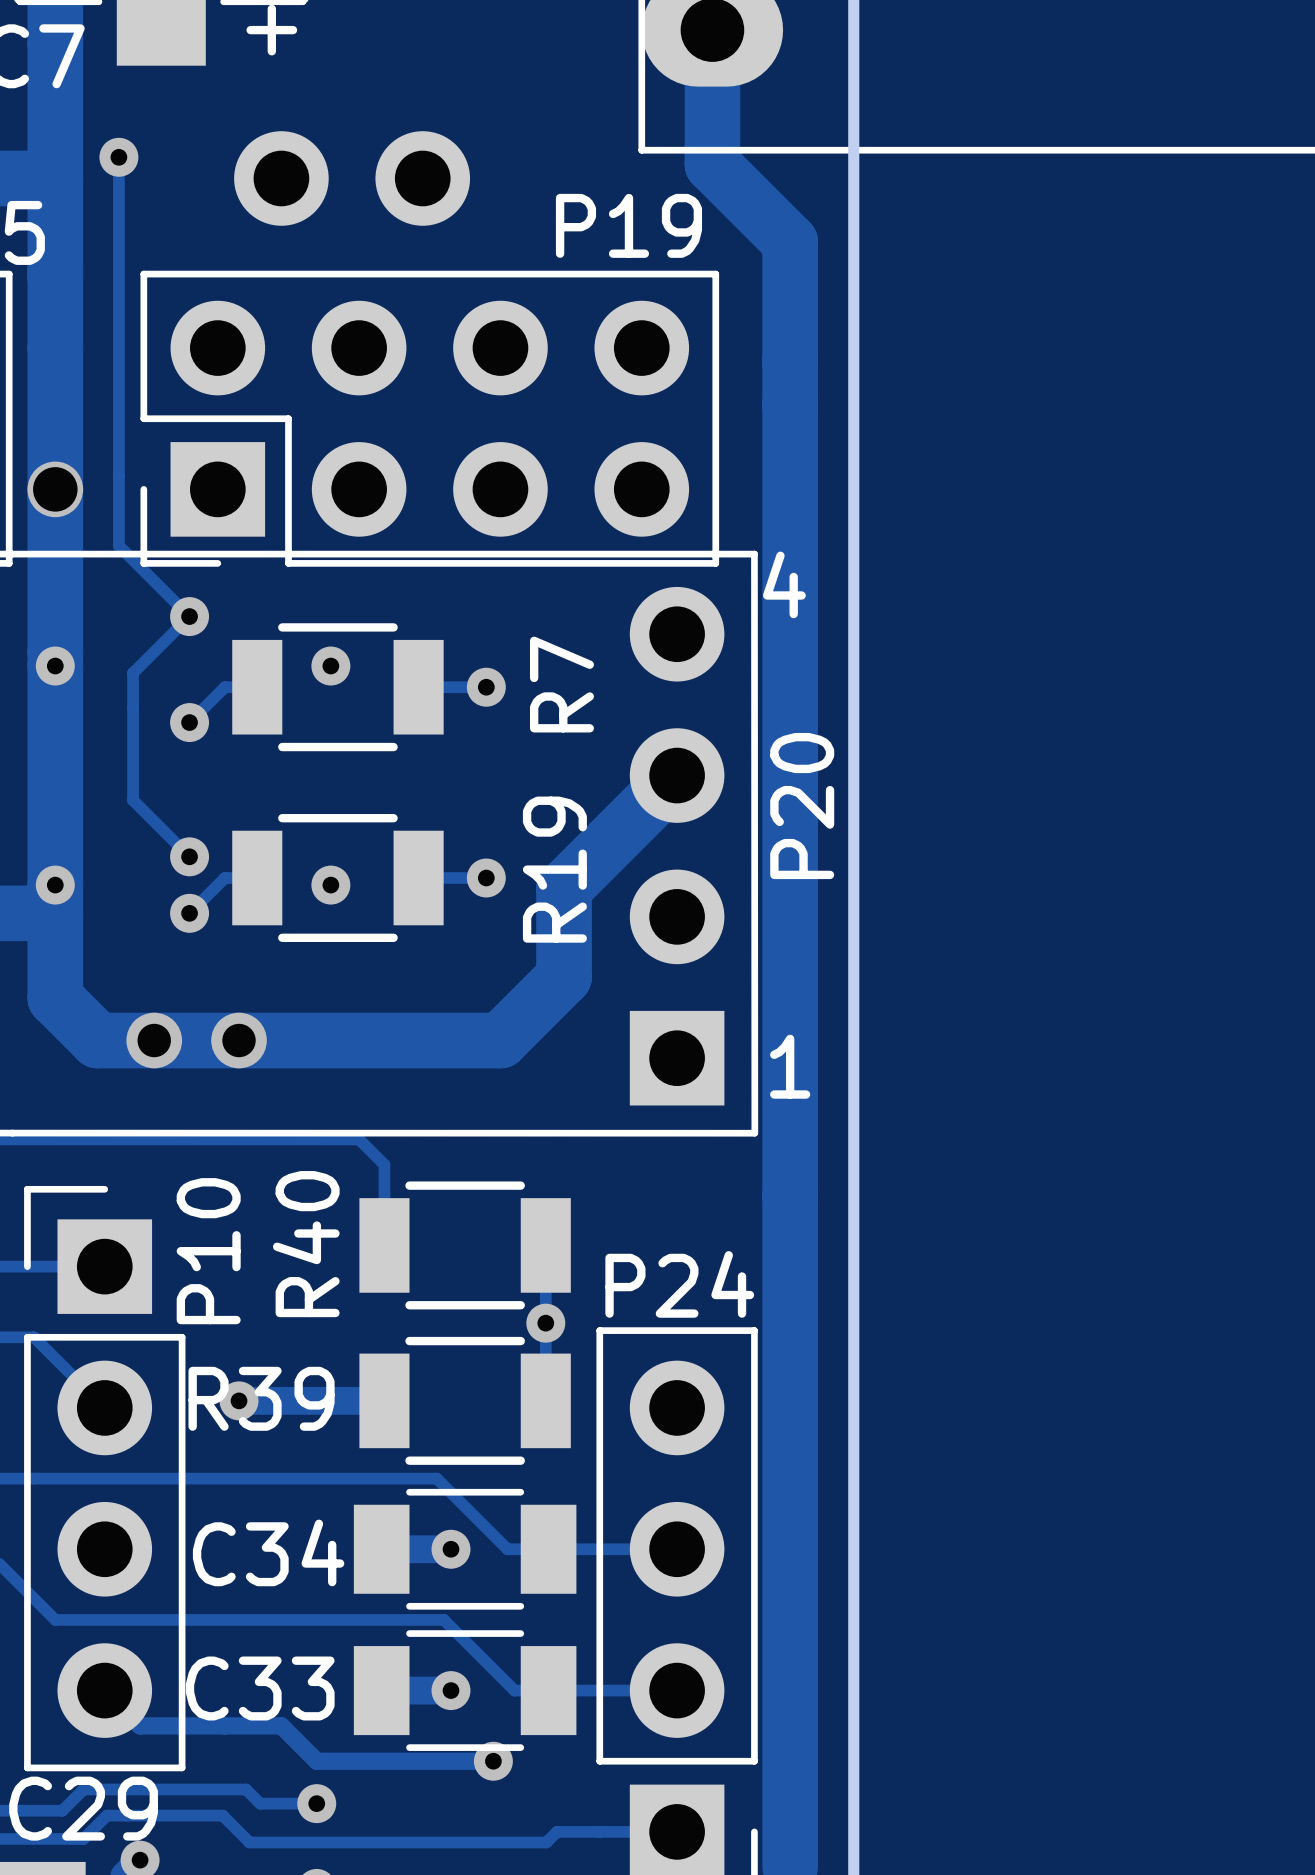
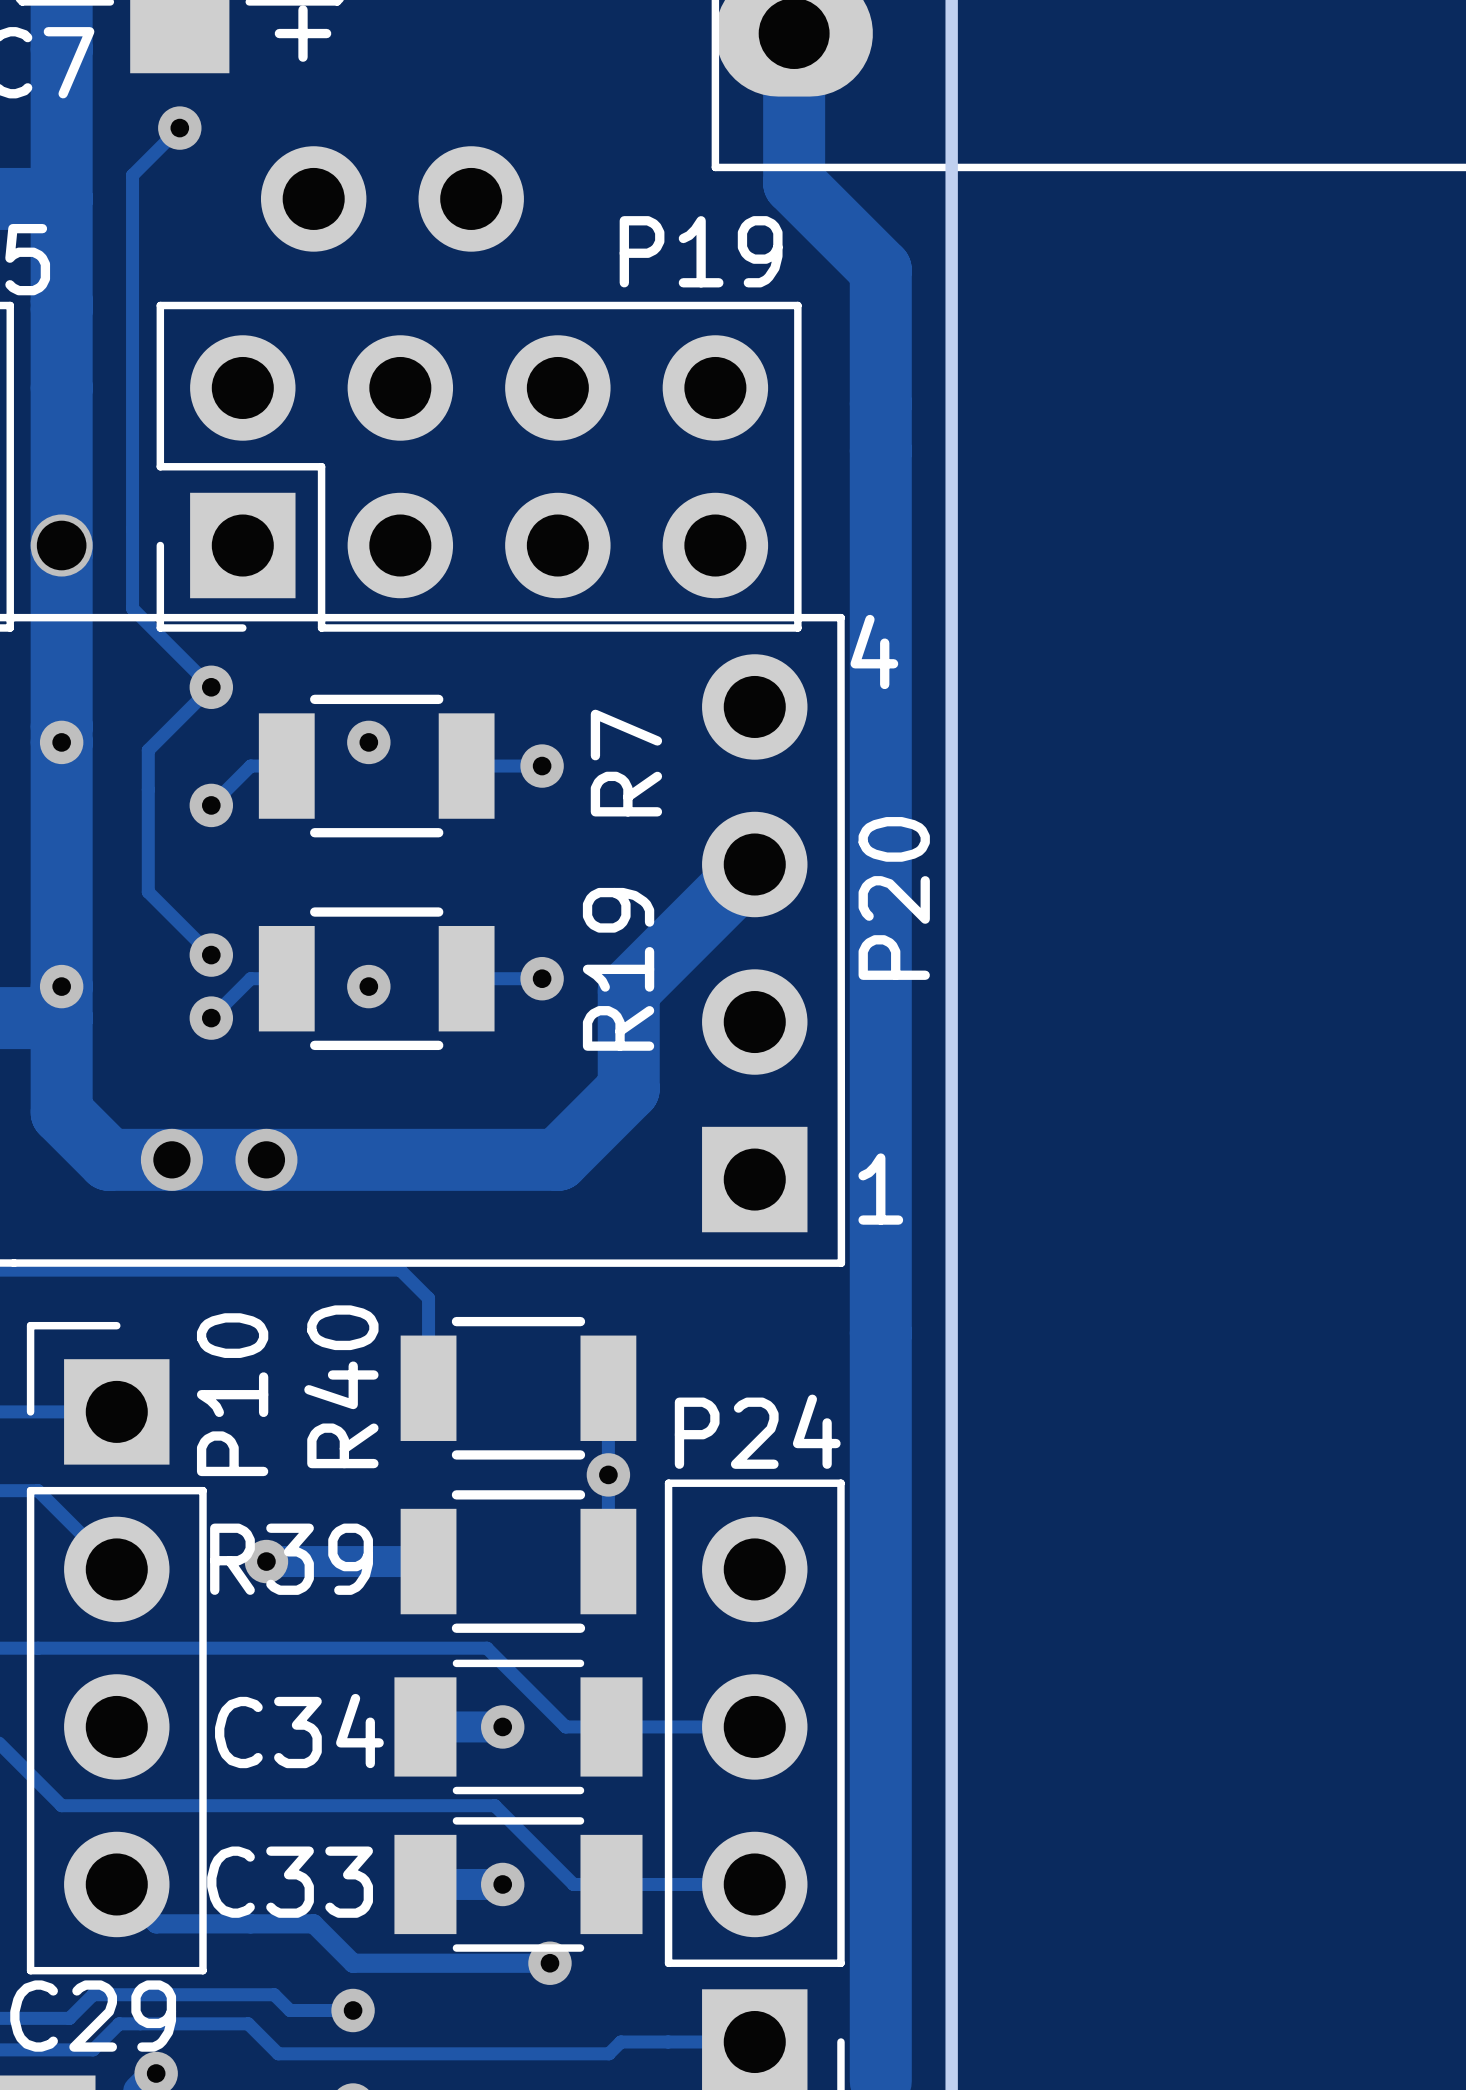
track: none -> (179, 128) (132, 175)
via position: (118, 157) -> (179, 128)

